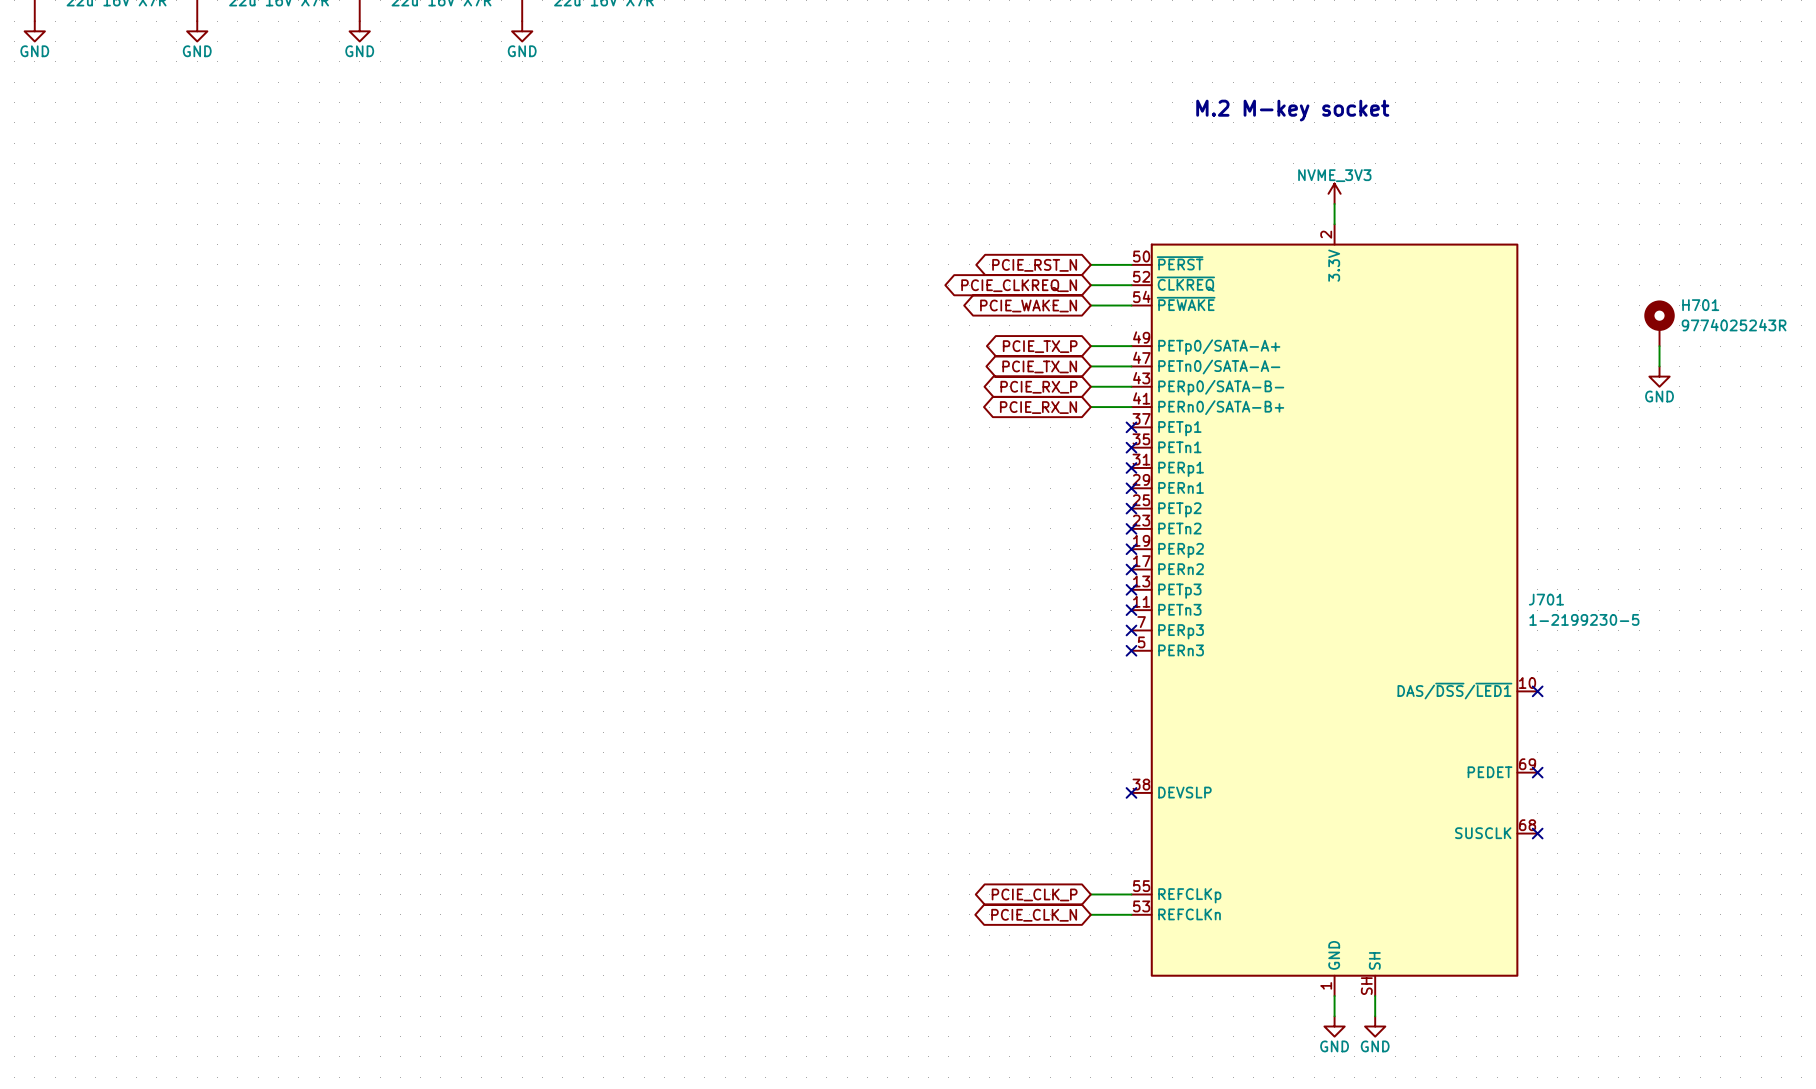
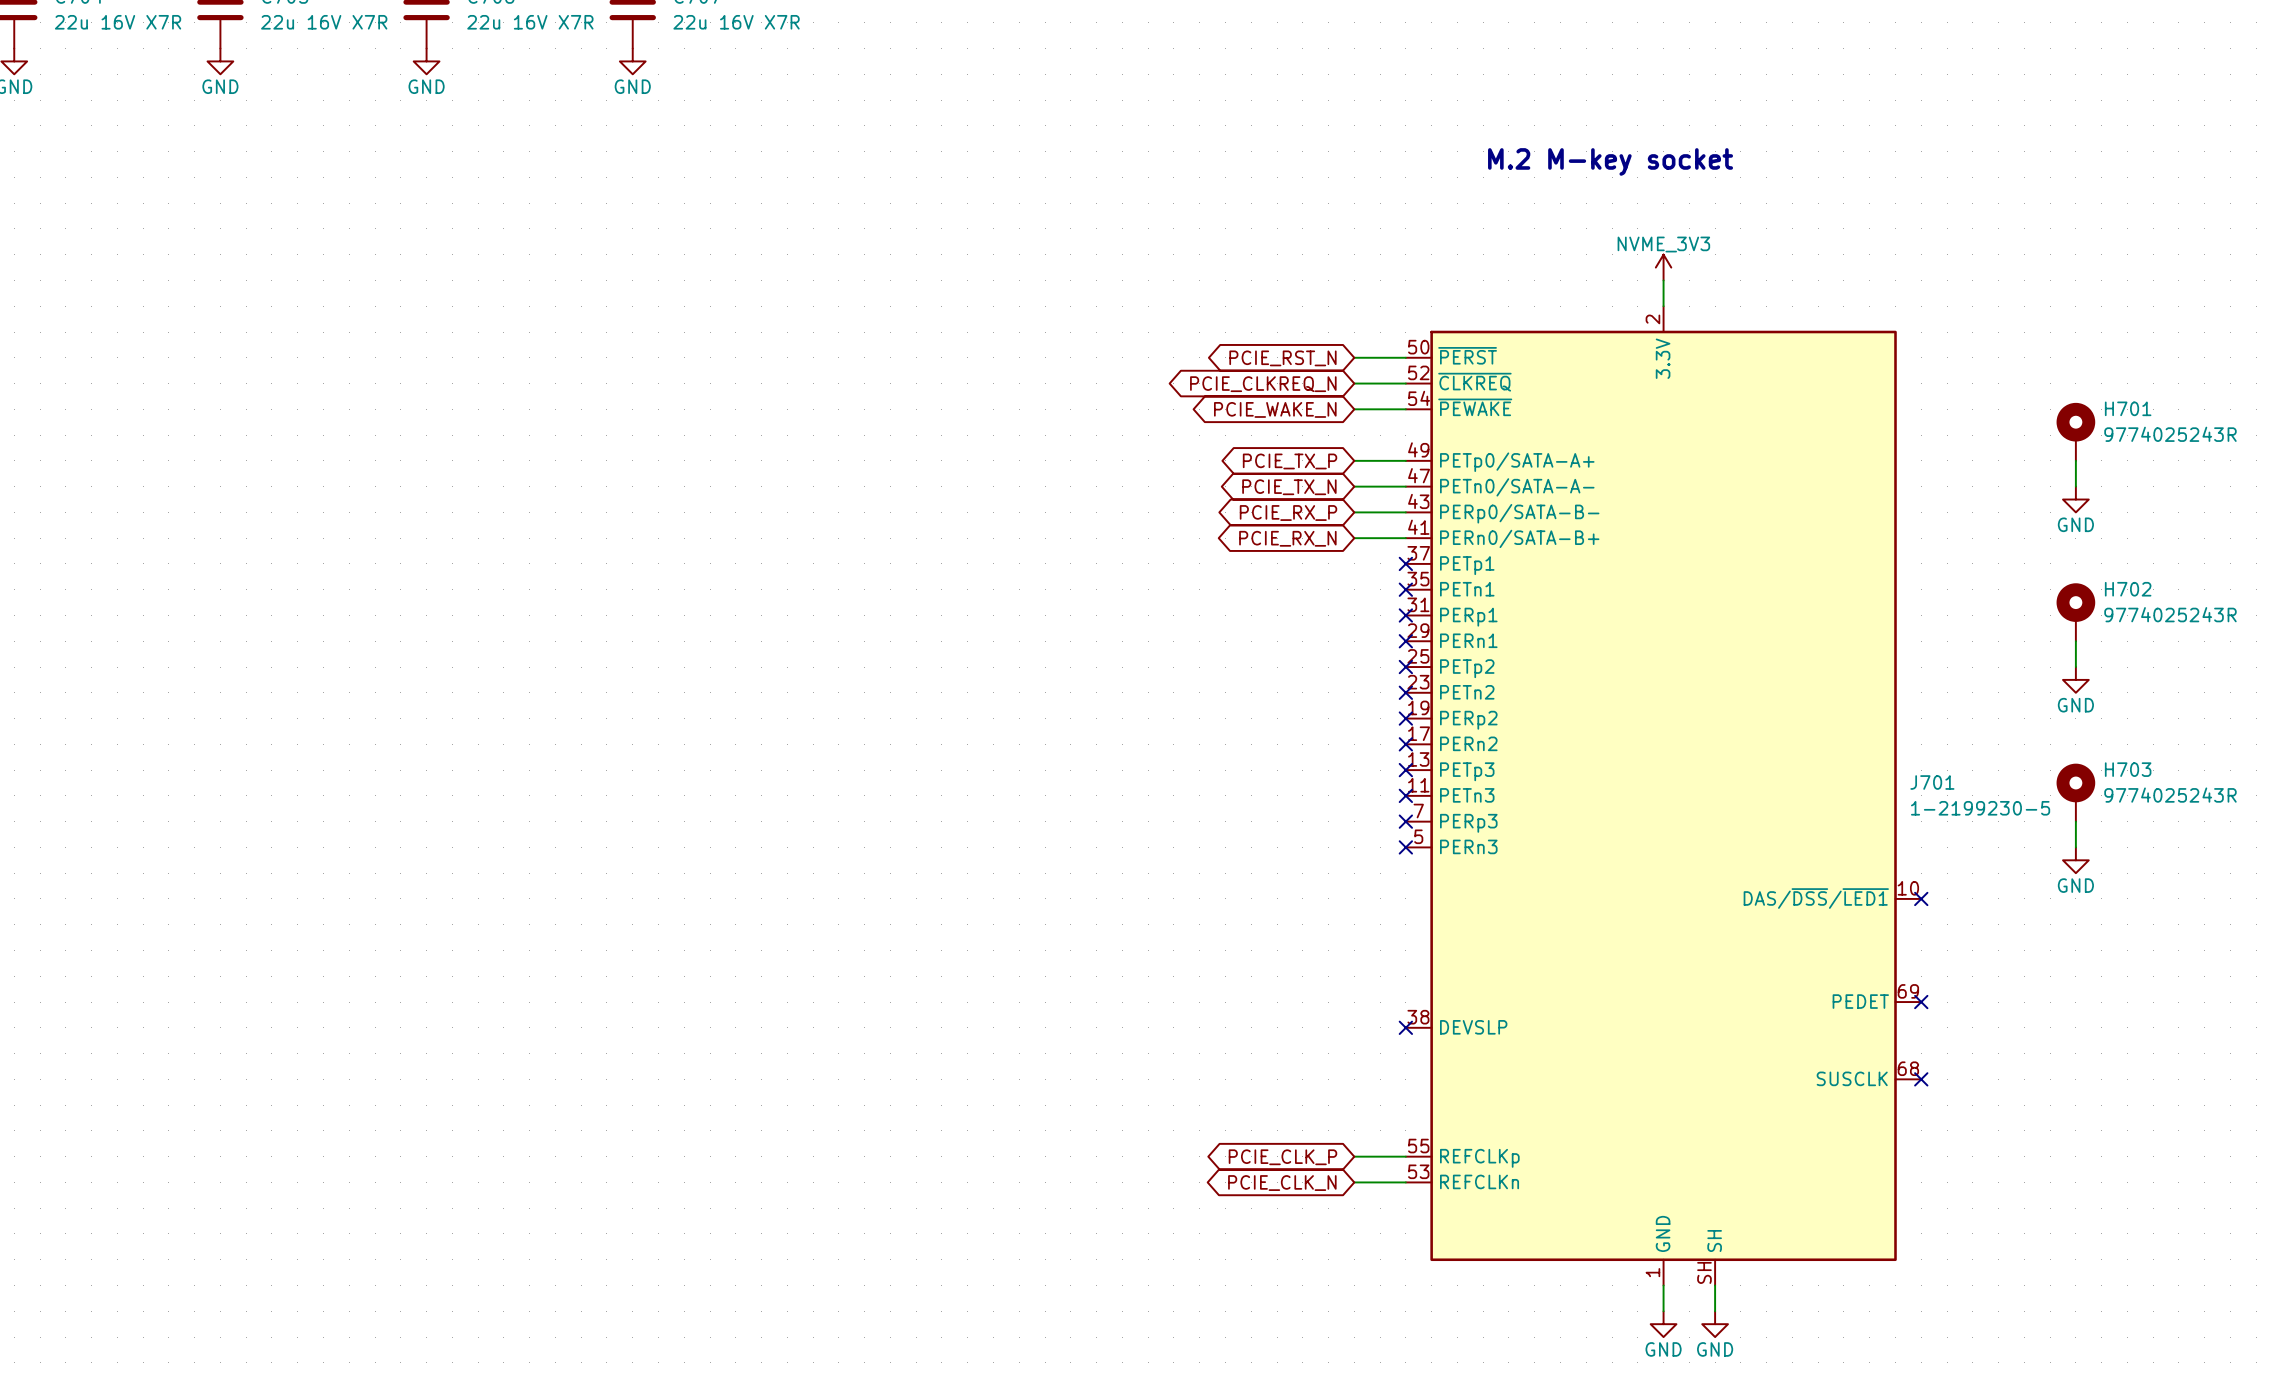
H702: none -> 9774025243R (2075, 612)
wire: none -> (2075, 641) (2075, 667)
power symbol: none -> GND (2075, 679)
H703: none -> 9774025243R (2075, 792)
wire: none -> (2075, 821) (2075, 847)
power symbol: none -> GND (2075, 860)

